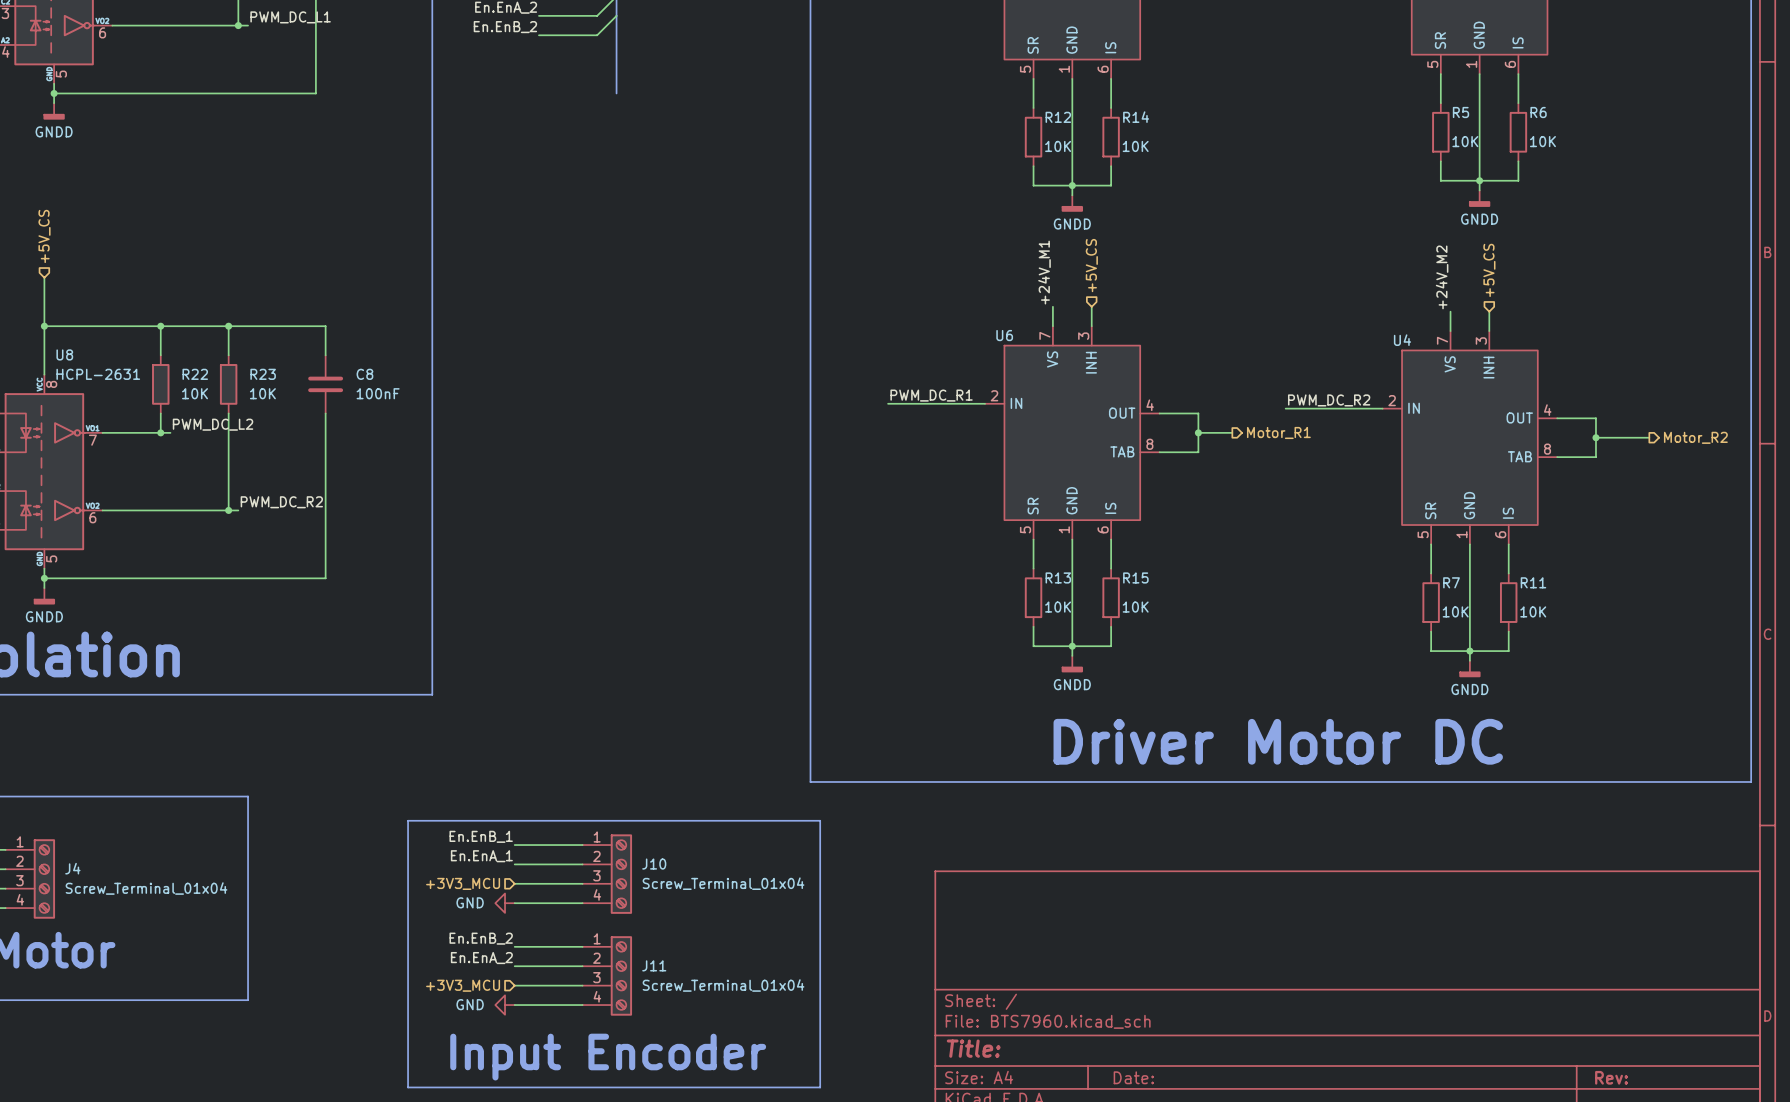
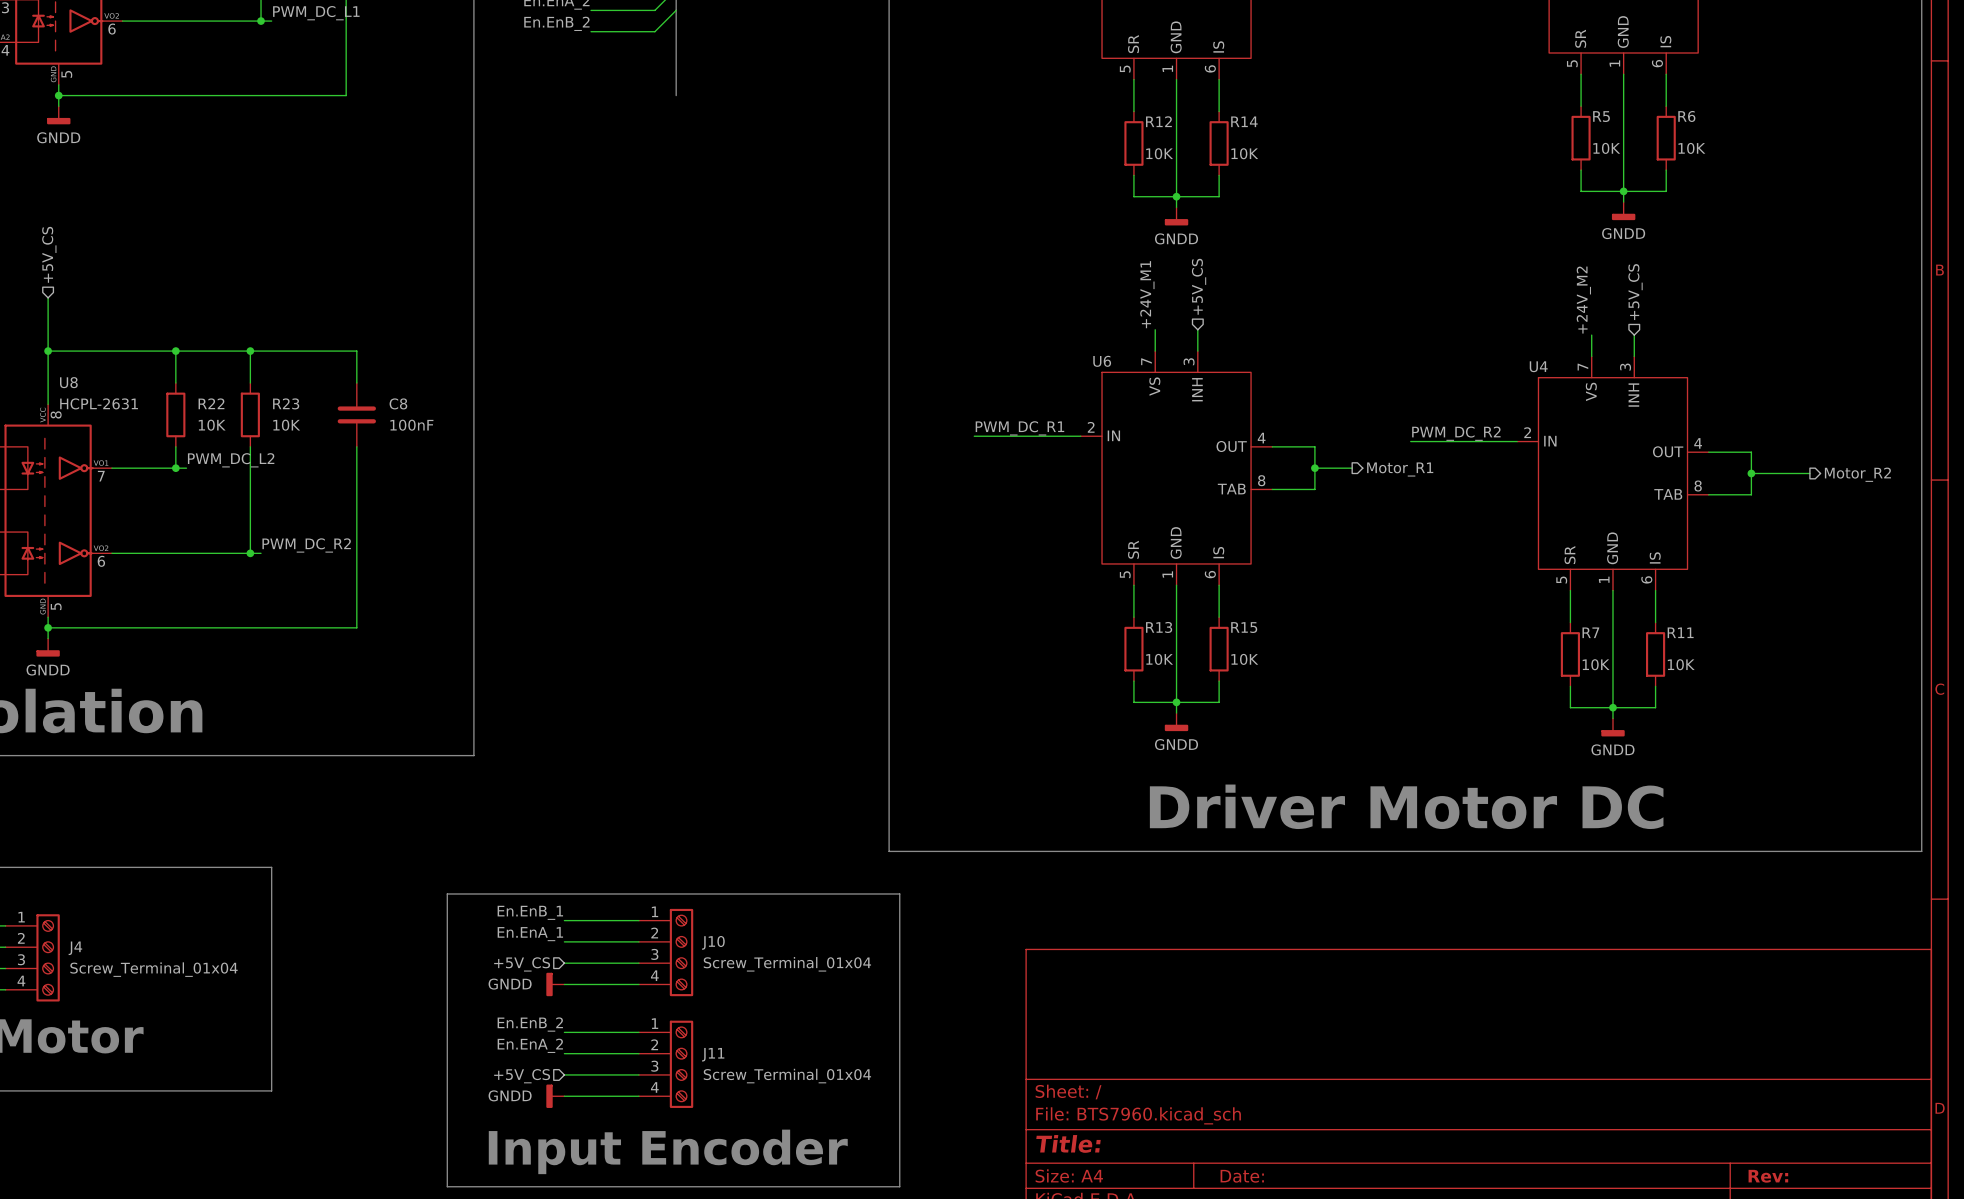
hierarchical label: +3V3_MCU (463, 883) -> +5V_CS (522, 964)
power symbol: GND (505, 903) -> GNDD (555, 984)
hierarchical label: +3V3_MCU (463, 985) -> +5V_CS (522, 1076)
power symbol: GND (505, 1005) -> GNDD (555, 1096)

